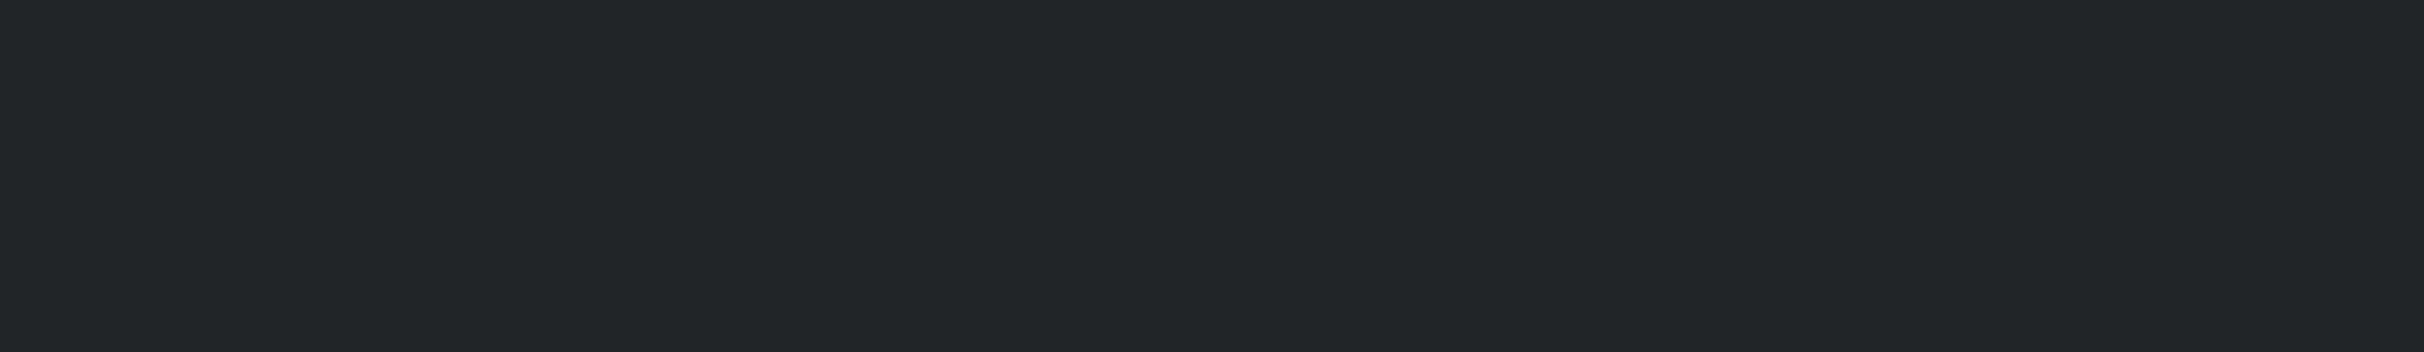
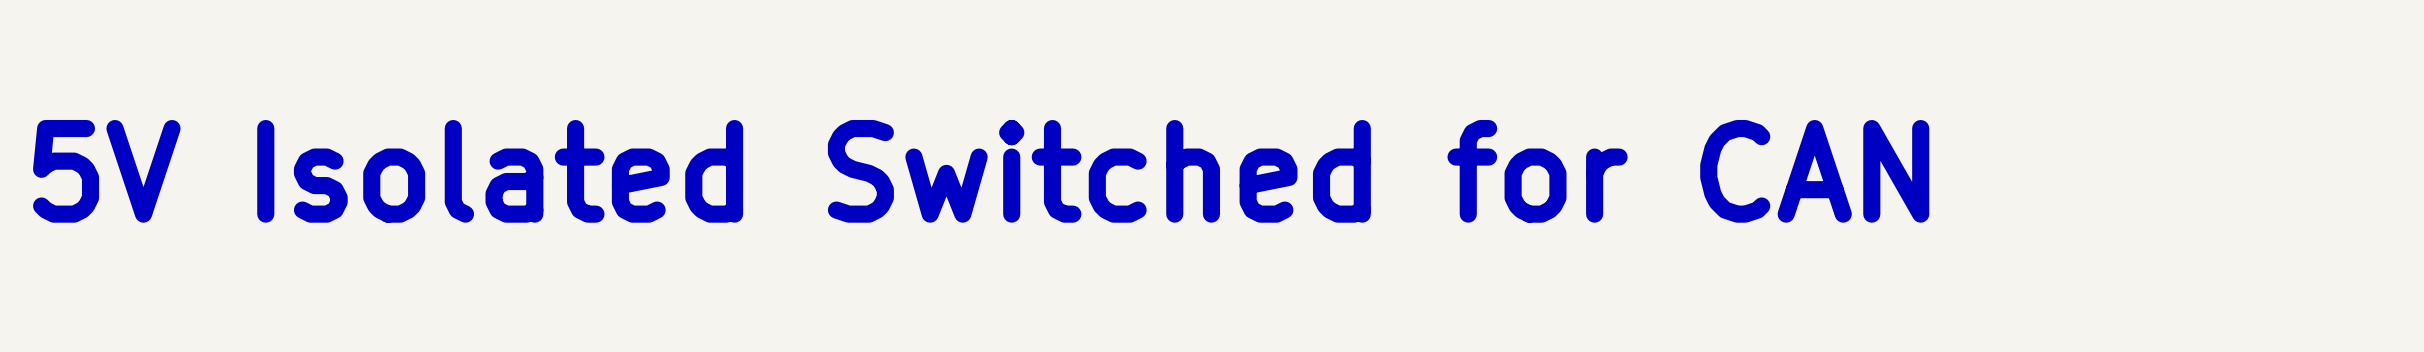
text: none -> 5V Isolated Switched for CAN (981, 171)

